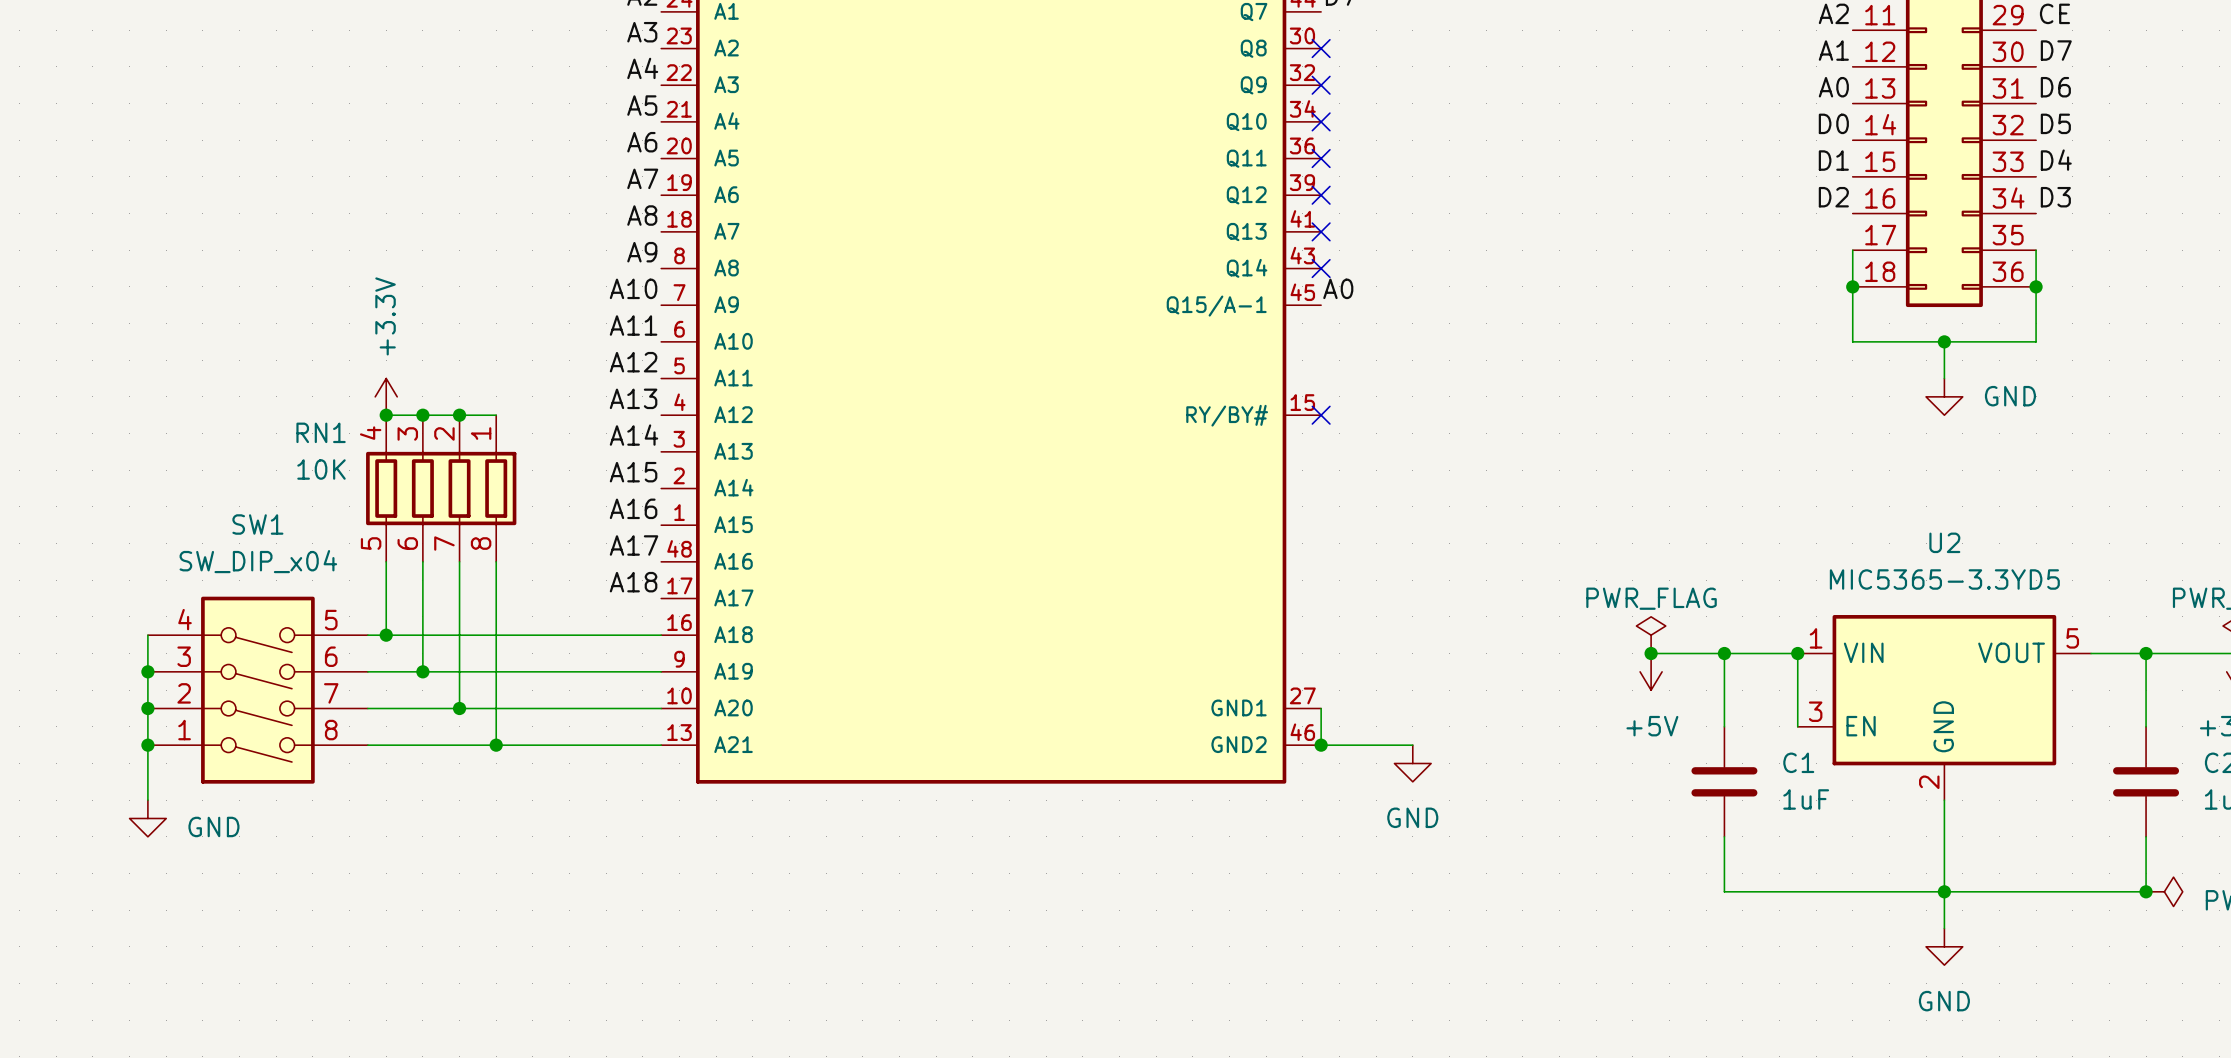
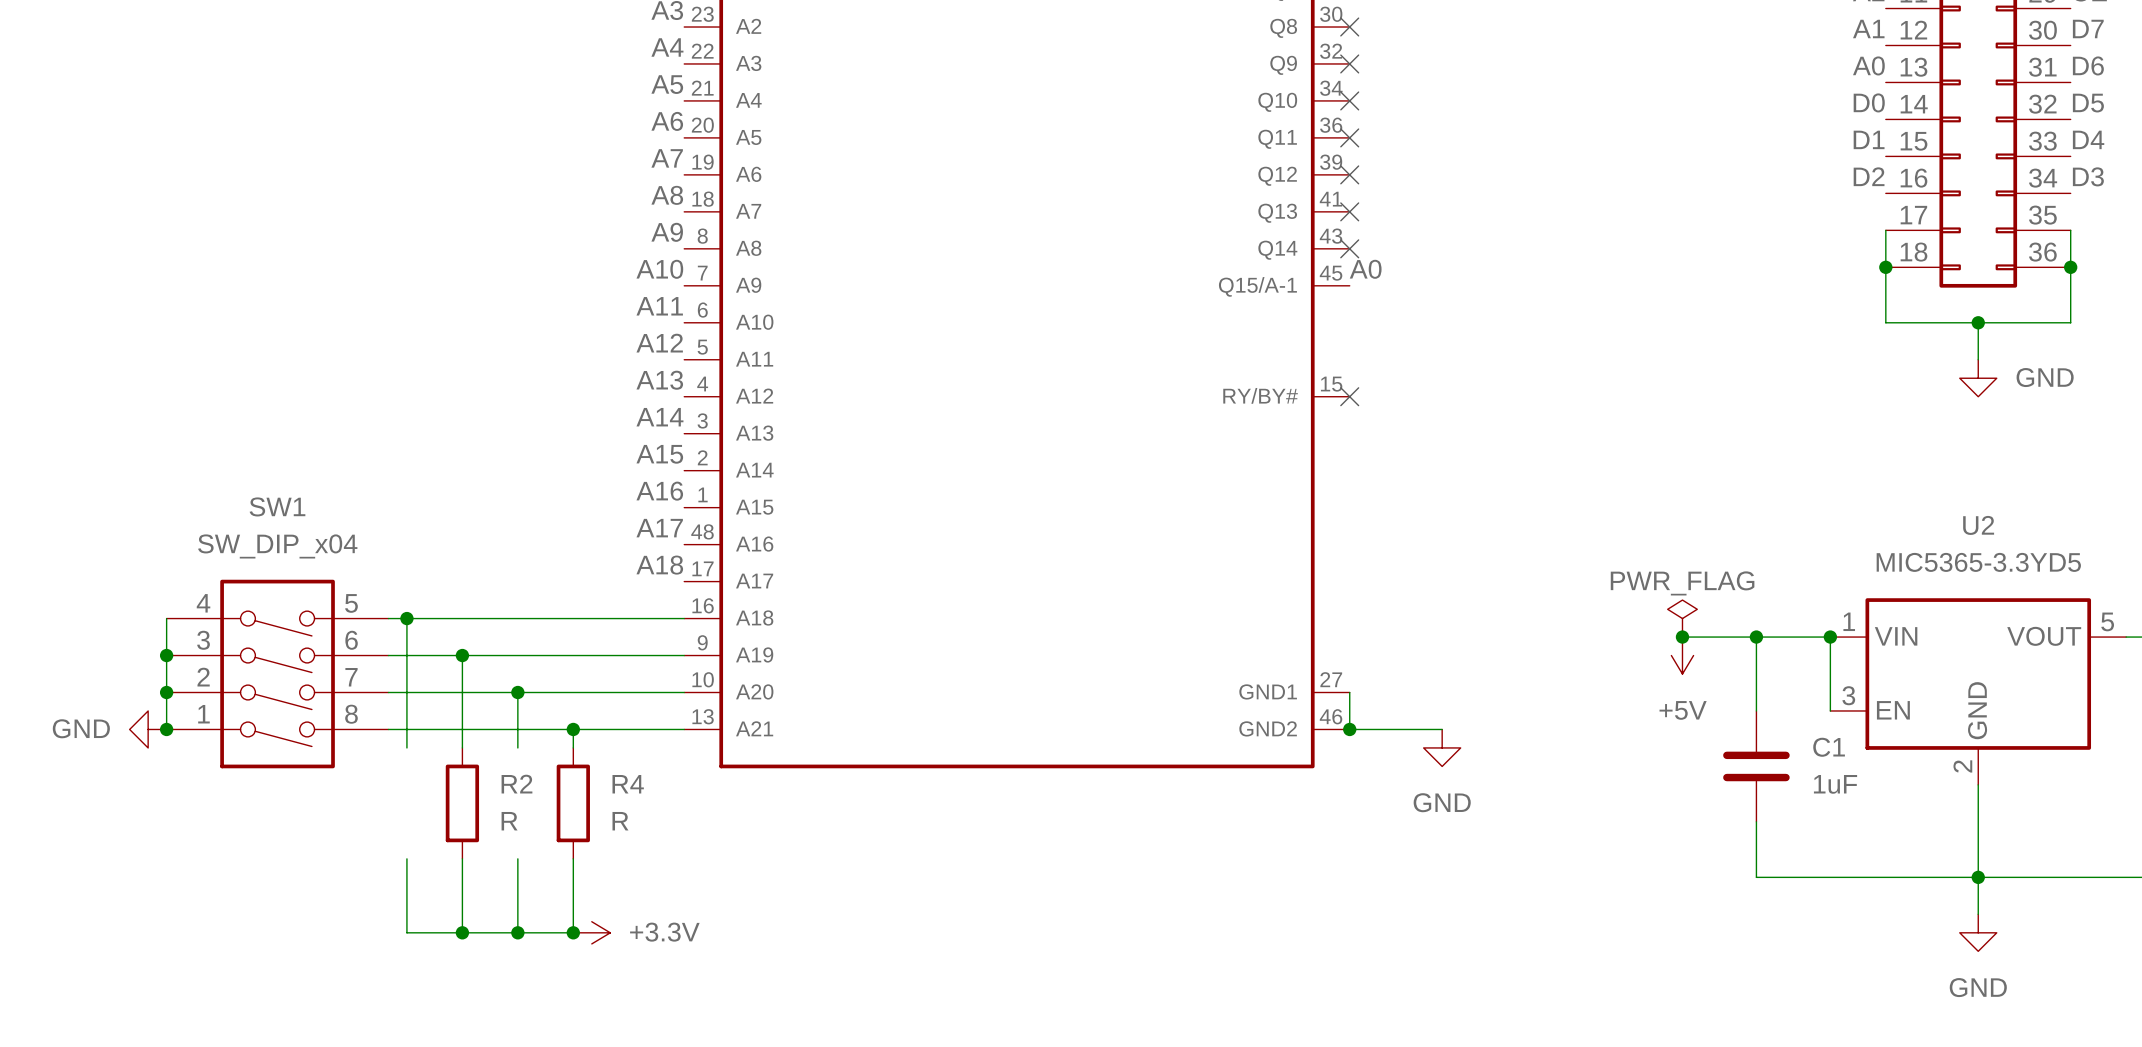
power symbol: +3.3V (386, 396) -> none
wire: (386, 415) (496, 415) -> none
junction: (386, 415) -> none
junction: (422, 415) -> none
junction: (459, 415) -> none
RN1: 10K (441, 488) -> none
wire: (386, 561) (386, 635) -> (406, 747) (406, 618)
wire: (422, 561) (422, 671) -> none
wire: (459, 561) (459, 708) -> none
wire: (496, 561) (496, 708) -> none
junction position: (422, 671) -> (462, 655)
wire: none -> (462, 655) (462, 747)
junction: (459, 708) -> none
junction: none -> (517, 692)
wire: (147, 745) (147, 800) -> none
wire: none -> (517, 729) (517, 747)
junction: (496, 745) -> none
wire: none -> (573, 729) (573, 747)
junction: none -> (573, 729)
power symbol rotation: 0° (147, 818) -> 90° clockwise (148, 729)
power symbol position: GND (147, 818) -> GND (148, 729)
R2: none -> R (462, 803)
R4: none -> R (573, 803)
power symbol text position: GND (213, 826) -> GND (81, 728)
wire: none -> (406, 858) (406, 932) (573, 932) (573, 858)
wire: none -> (462, 858) (462, 932)
wire: none -> (517, 858) (517, 932)
junction: none -> (462, 932)
junction: none -> (517, 932)
junction: none -> (573, 932)
power symbol: none -> +3.3V (591, 932)

